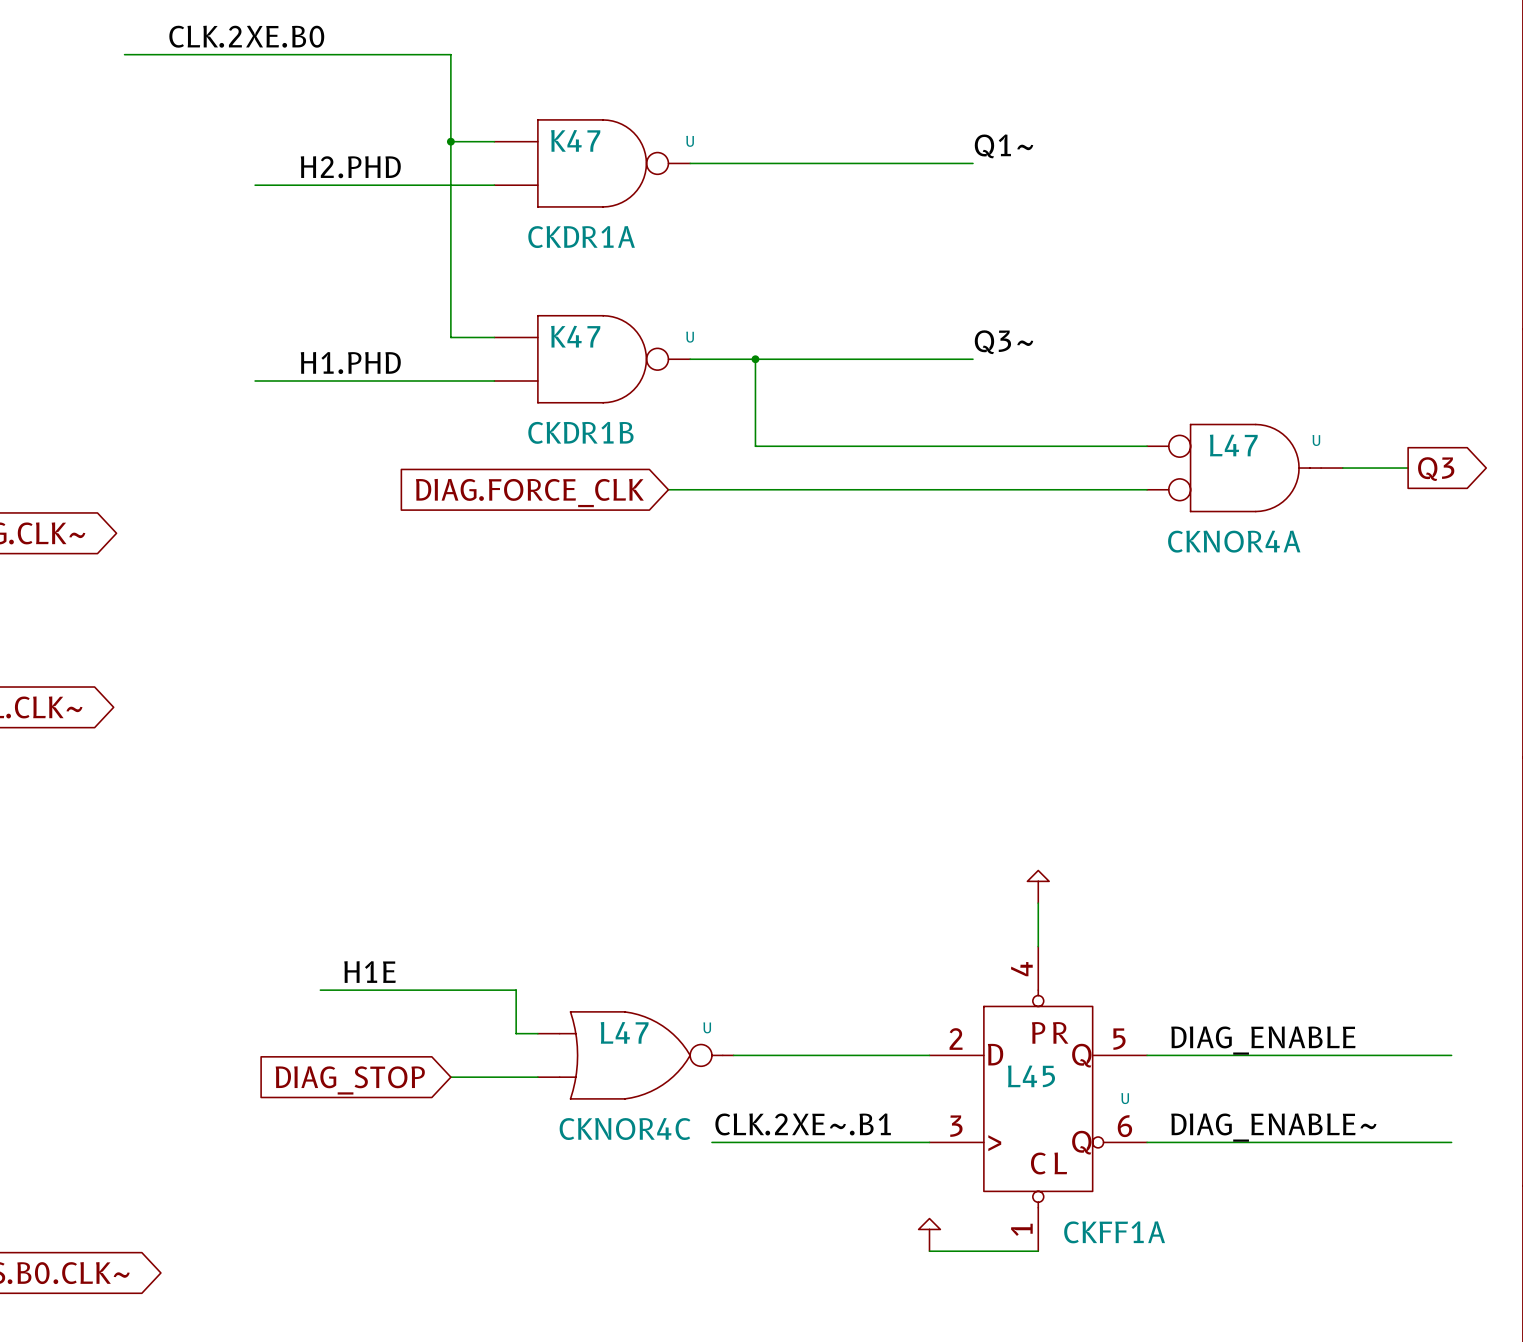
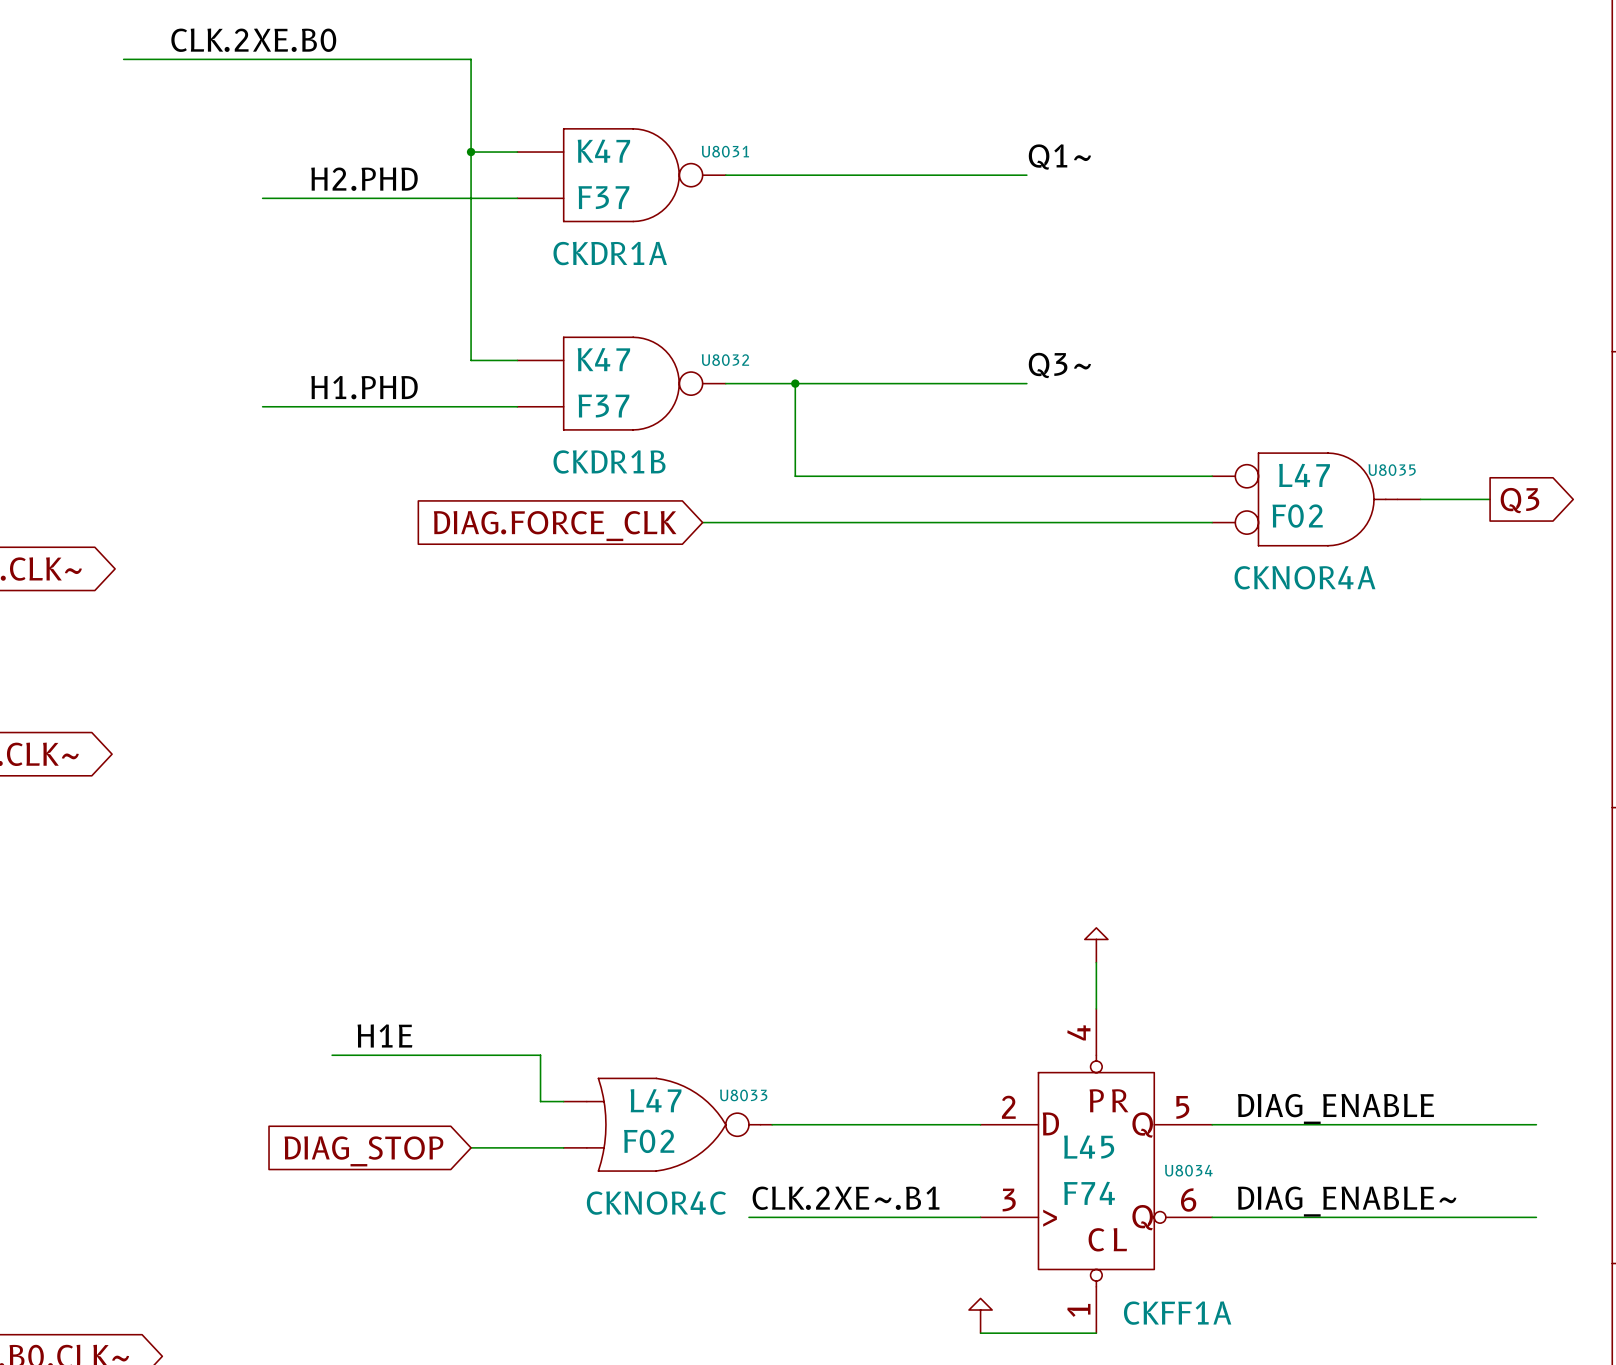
U name: U (690, 141) -> U8031 (725, 151)
U value: none -> F37 (603, 197)
U name: U (690, 337) -> U8032 (725, 360)
U value: none -> F37 (603, 406)
U name: U (1316, 440) -> U8035 (1392, 470)
U value: none -> F02 (1297, 516)
U name: U (707, 1027) -> U8033 (743, 1095)
U value: none -> F02 (649, 1141)
U name: U (1125, 1098) -> U8034 (1188, 1170)
U value: none -> F74 (1089, 1193)

